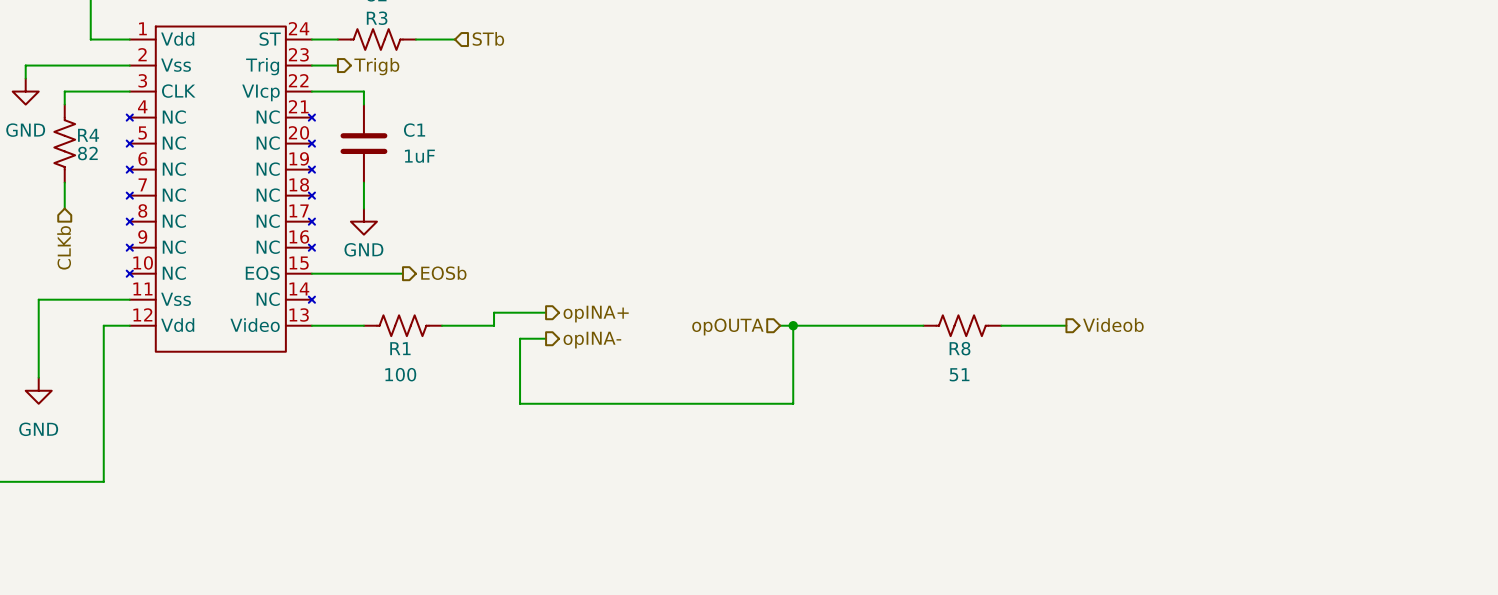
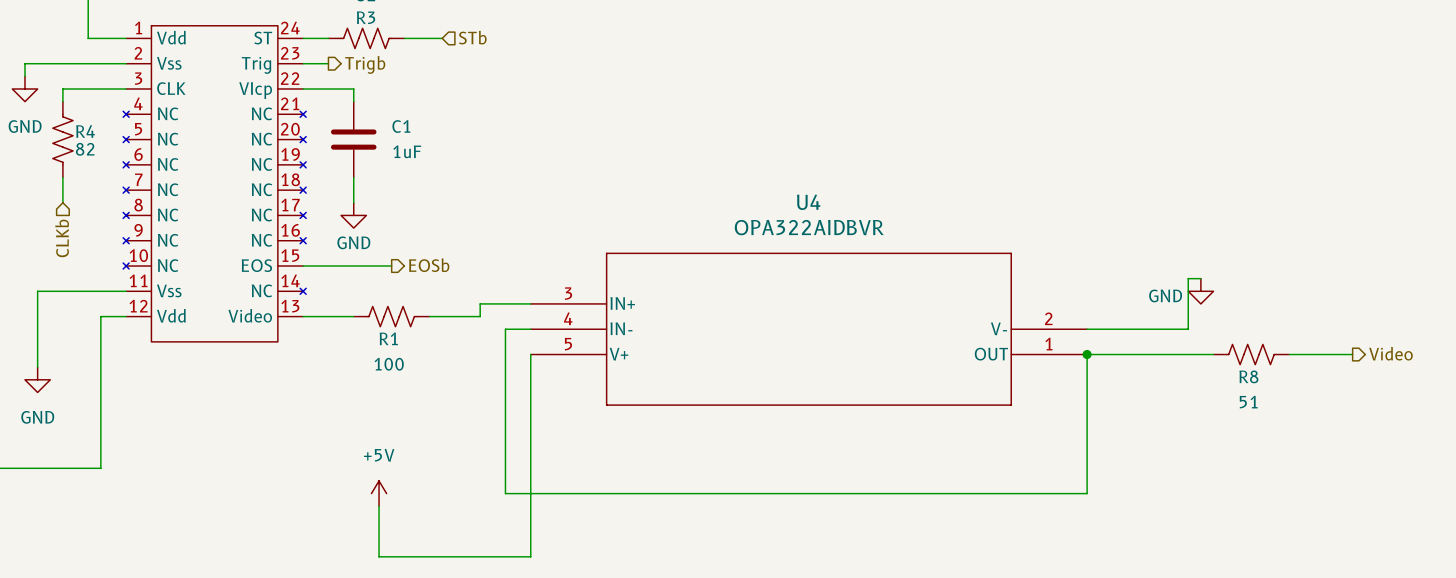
wire: none -> (1200, 278) (1188, 278) (1188, 329) (1087, 329)
power symbol: none -> GND (1200, 291)
hierarchical label: opINA+ (596, 314) -> none
wire: (780, 325) (923, 325) -> none
wire: (793, 325) (793, 403) (520, 403) -> (1213, 354) (1087, 354) (1087, 493) (505, 493) (505, 392)
junction: (793, 325) -> none
R8 position: (962, 325) -> (1251, 354)
wire: (1001, 325) (1066, 325) -> none
hierarchical label: Videob (1113, 325) -> none
hierarchical label: opOUTA (727, 326) -> none
U4: none -> OPA322AIDBVR (808, 329)
hierarchical label: opINA- (592, 340) -> none
wire: none -> (530, 354) (530, 556) (379, 556) (379, 506)
junction: none -> (1087, 354)
wire: none -> (1289, 354) (1352, 354)
hierarchical label: none -> Video (1391, 353)
power symbol: none -> +5V (379, 493)

